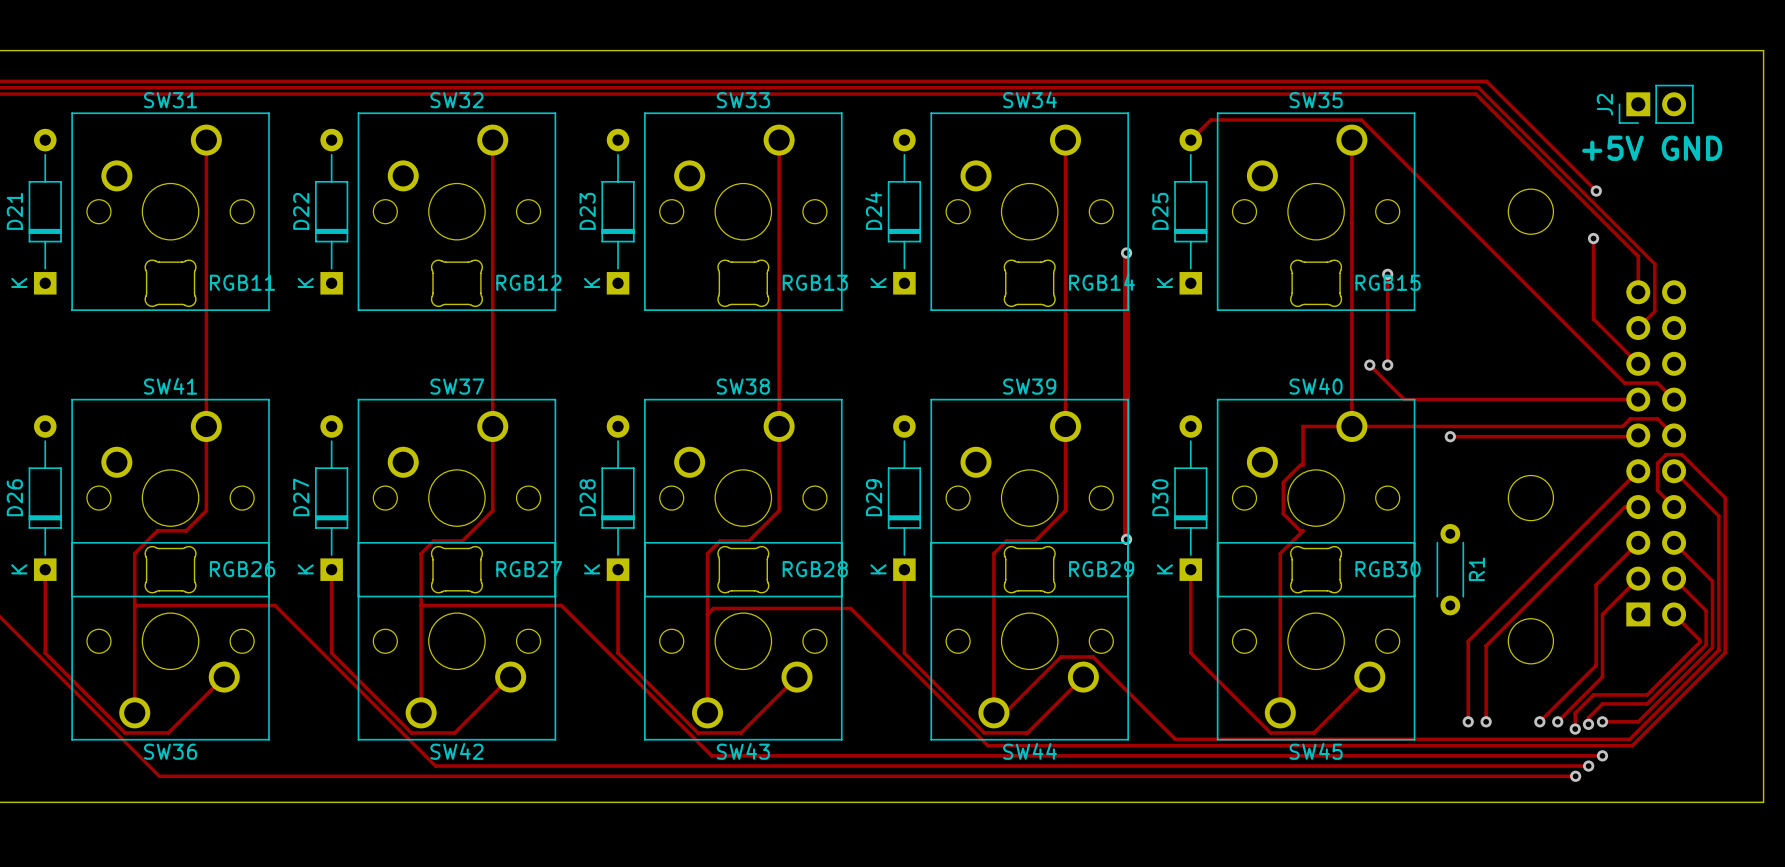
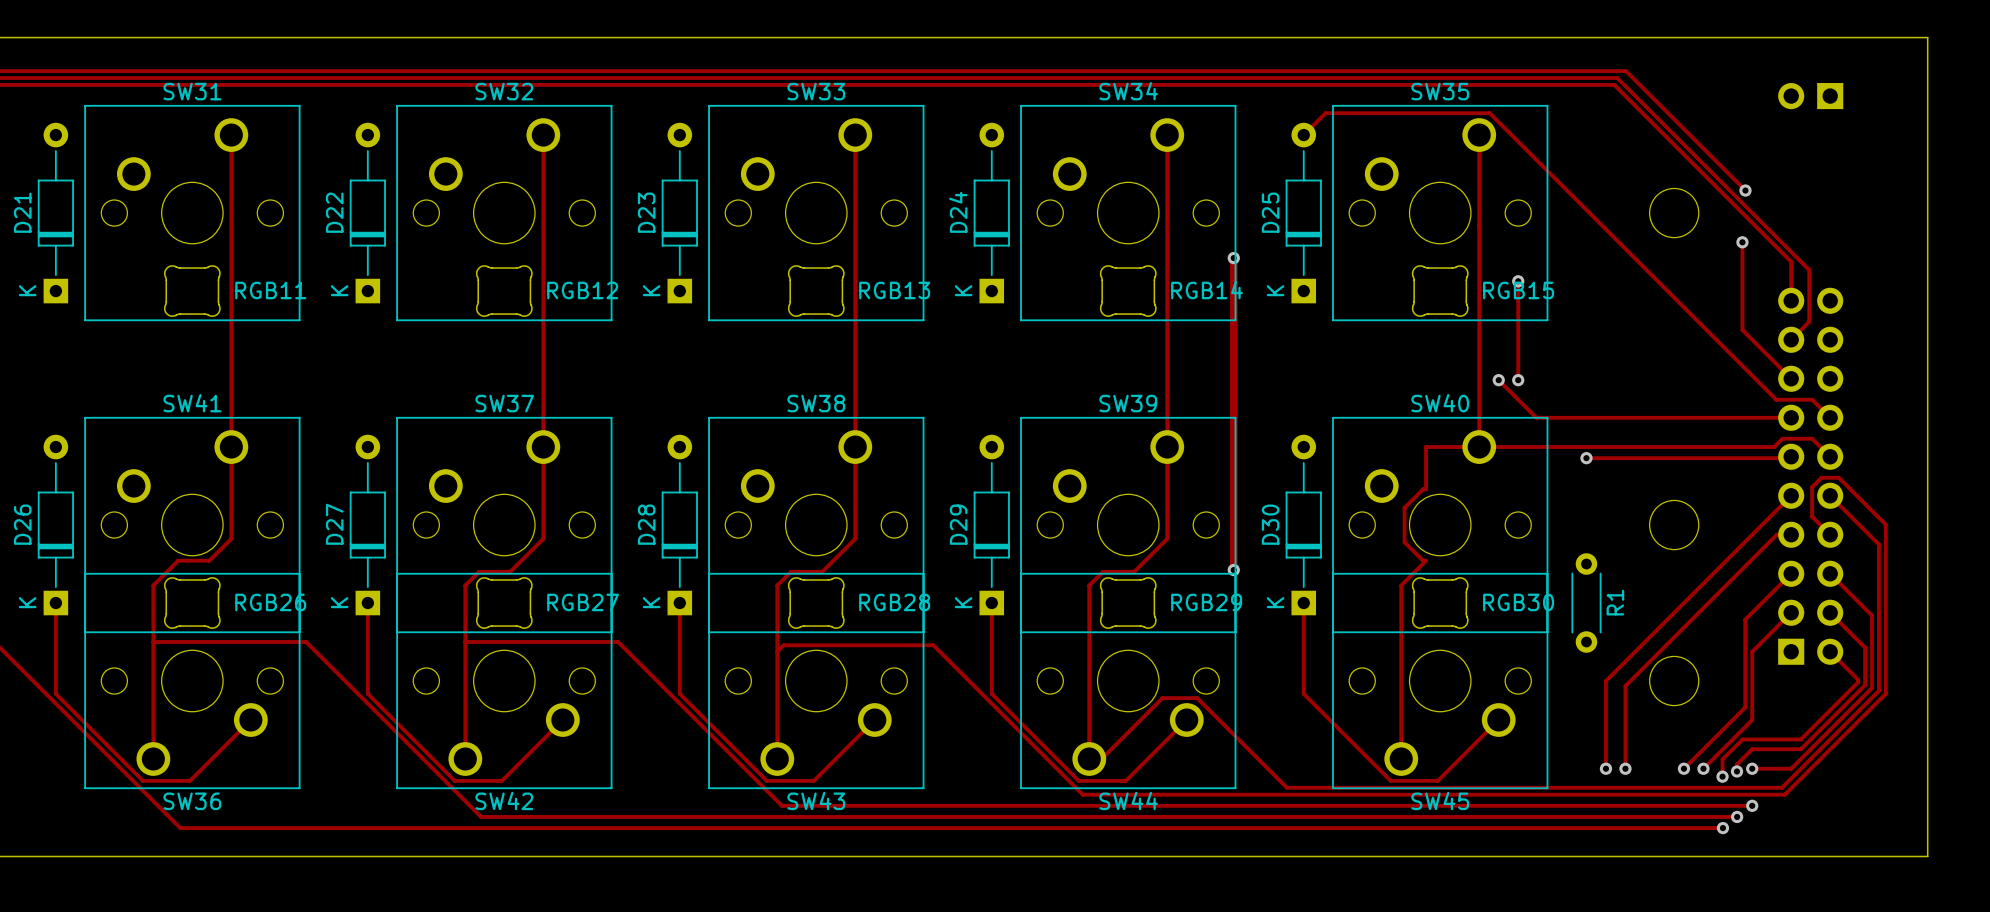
J2 side: top (1656, 104) -> bottom (1810, 96)
text: +5V (1612, 148) -> none
text: GND (1691, 148) -> none

